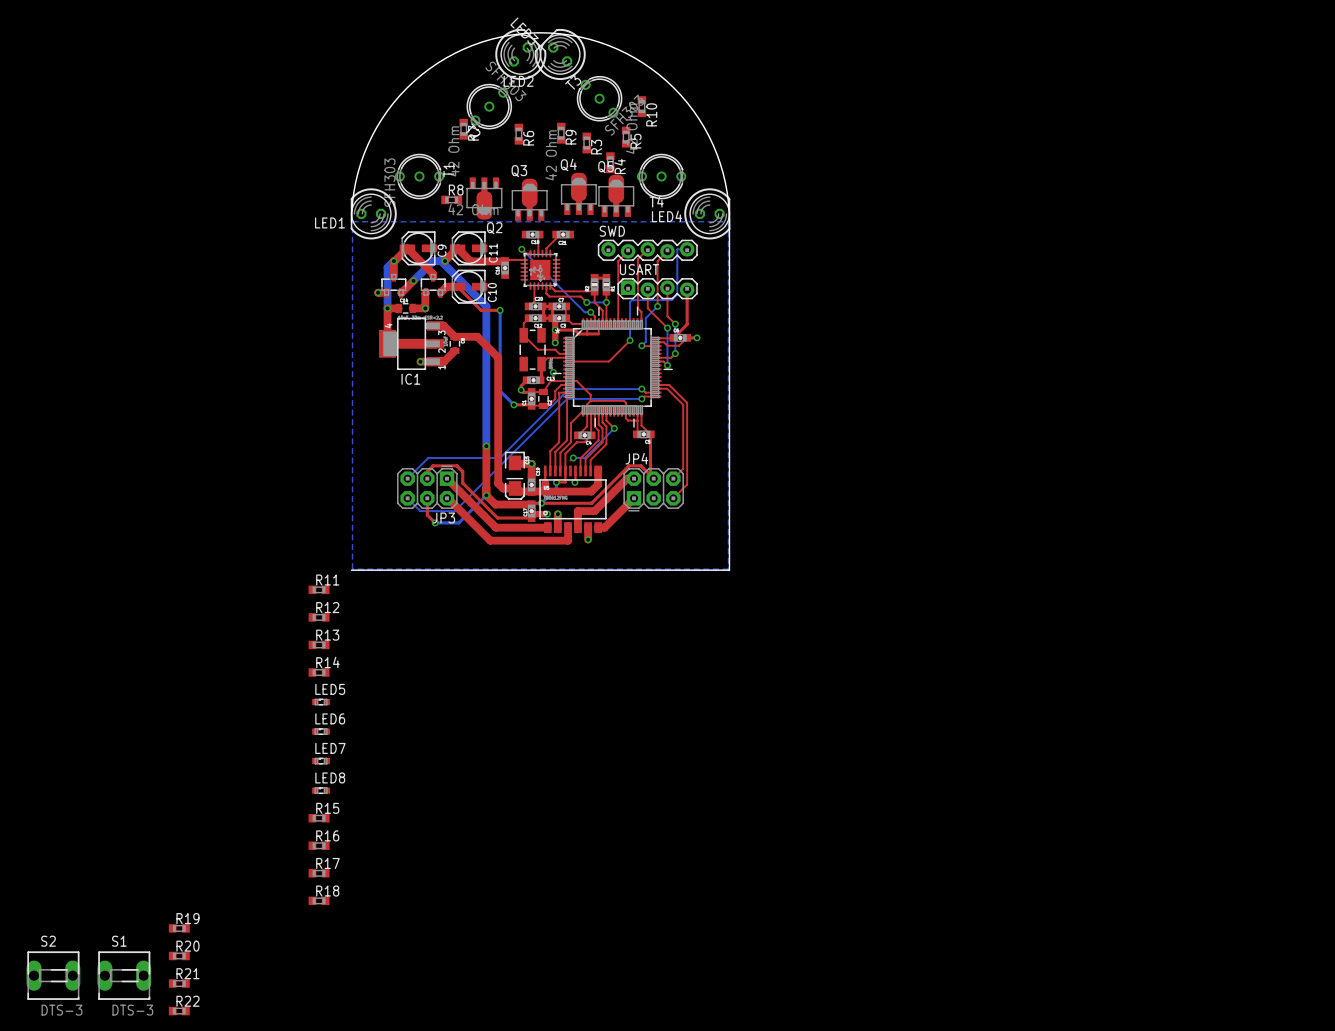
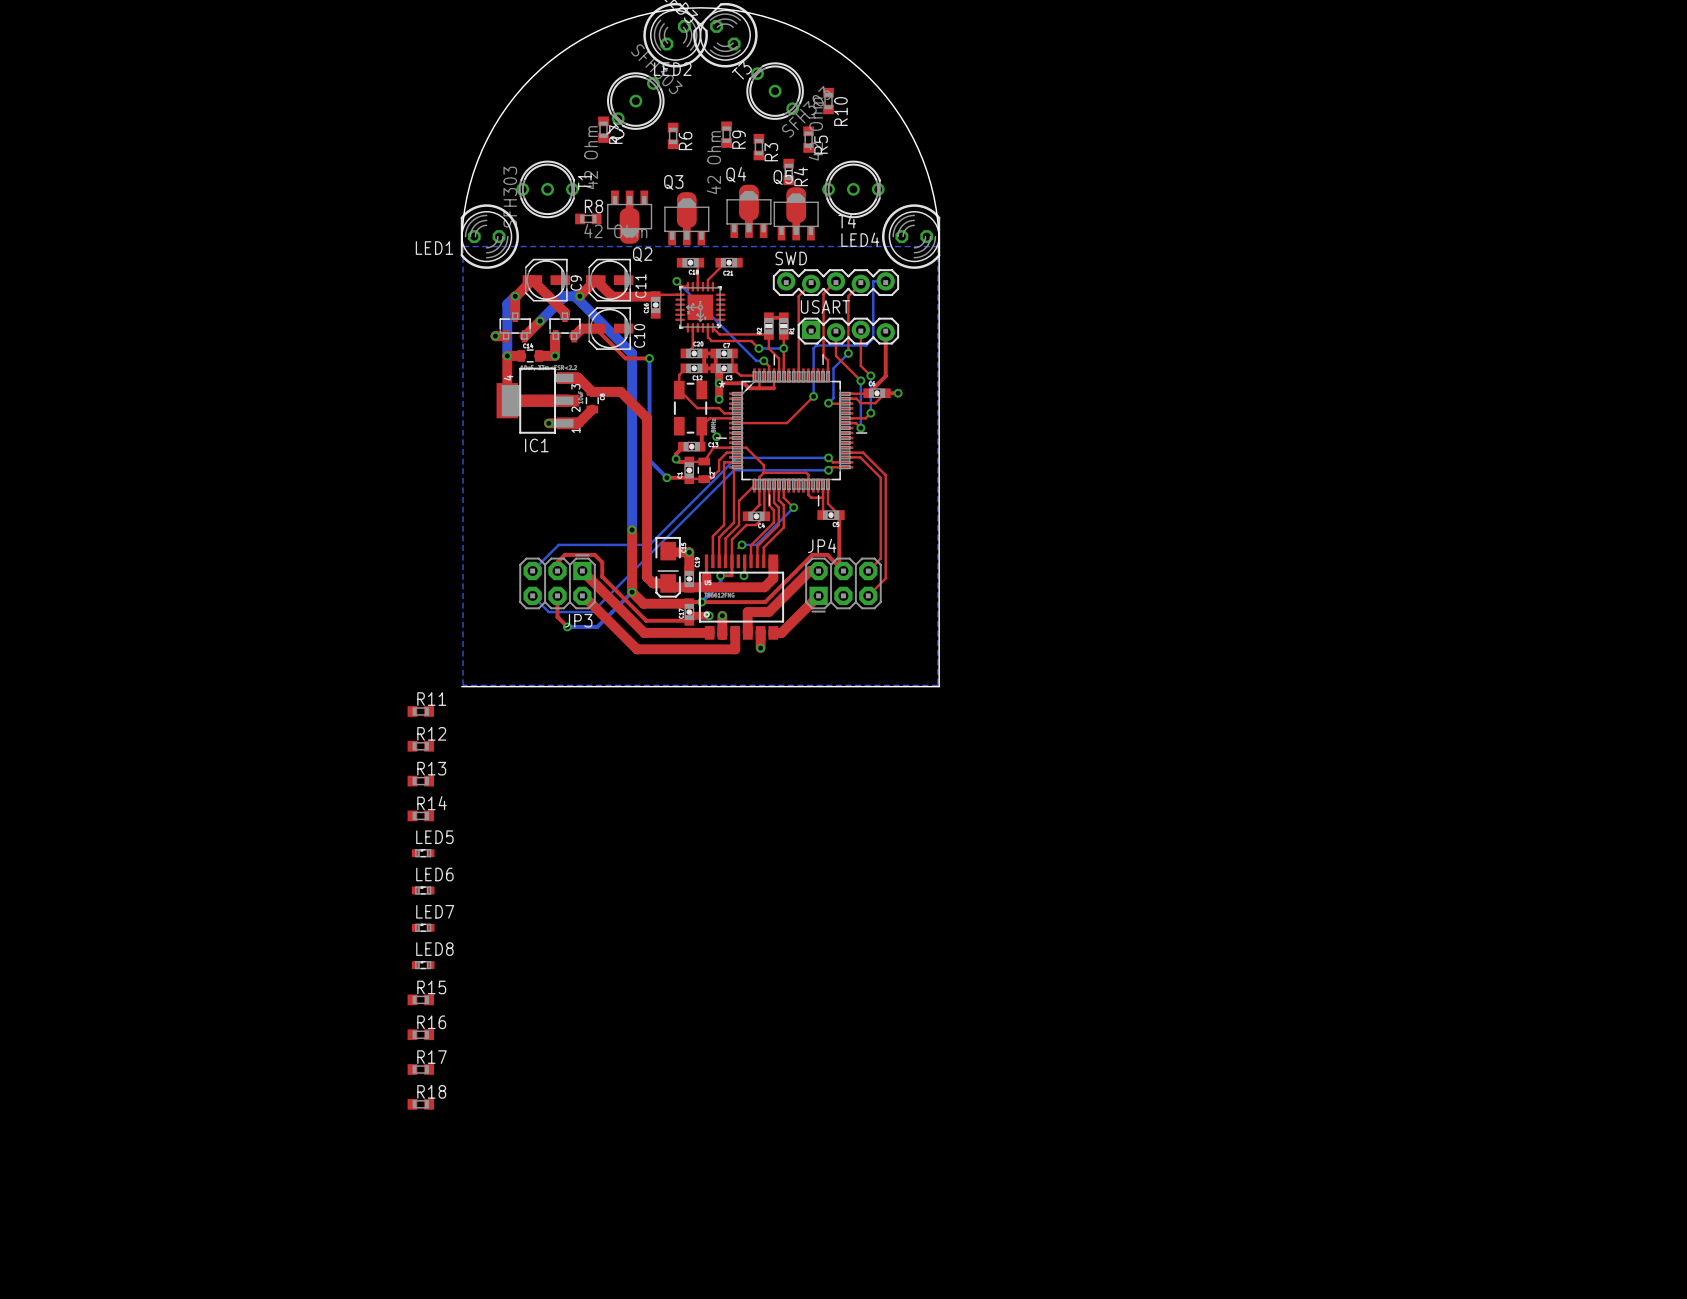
R19: (179, 928) -> none
R20: (179, 955) -> none
S2: DTS-3 (53, 975) -> none
S1: DTS-3 (124, 975) -> none
R21: (179, 983) -> none
R22: (179, 1011) -> none

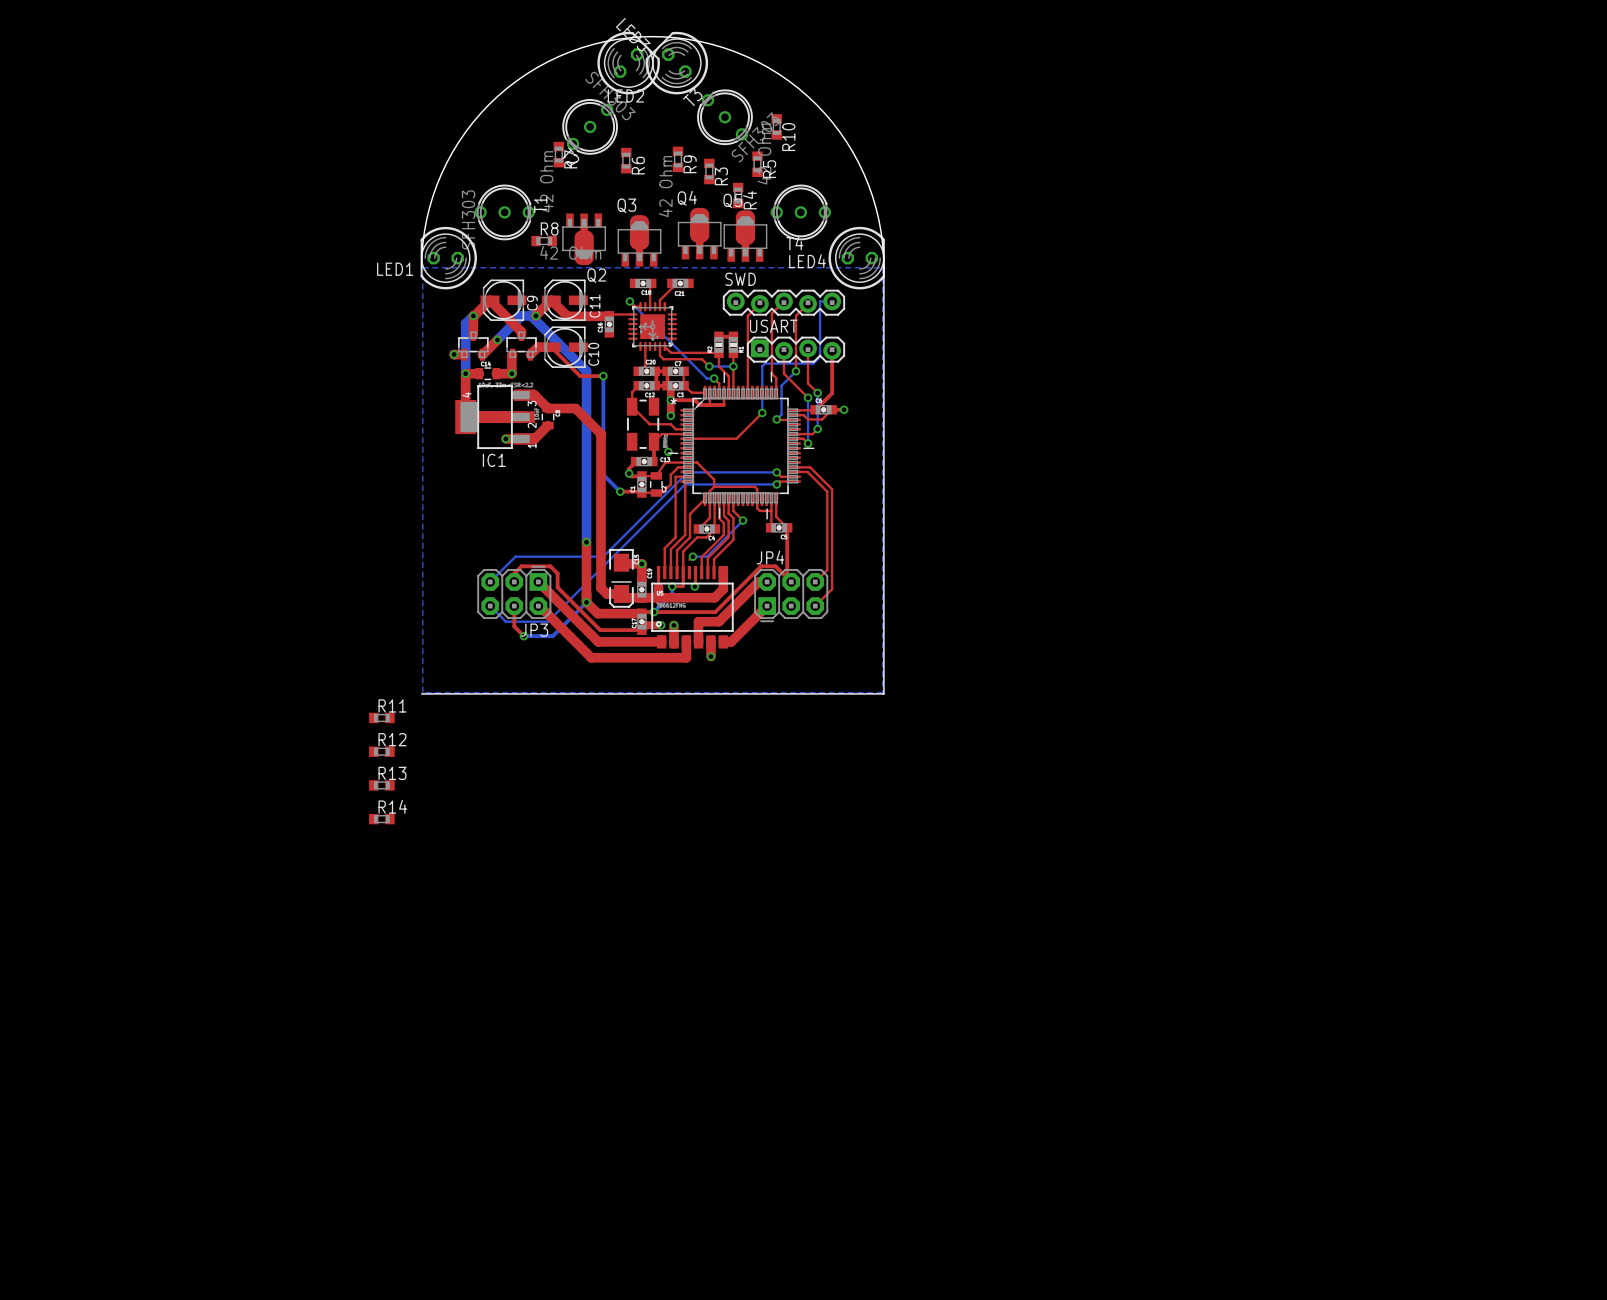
LED5: (423, 853) -> none
LED6: (423, 890) -> none
LED7: (423, 927) -> none
LED8: (423, 965) -> none
R15: (420, 999) -> none
R16: (420, 1034) -> none
R17: (420, 1069) -> none
R18: (420, 1104) -> none

